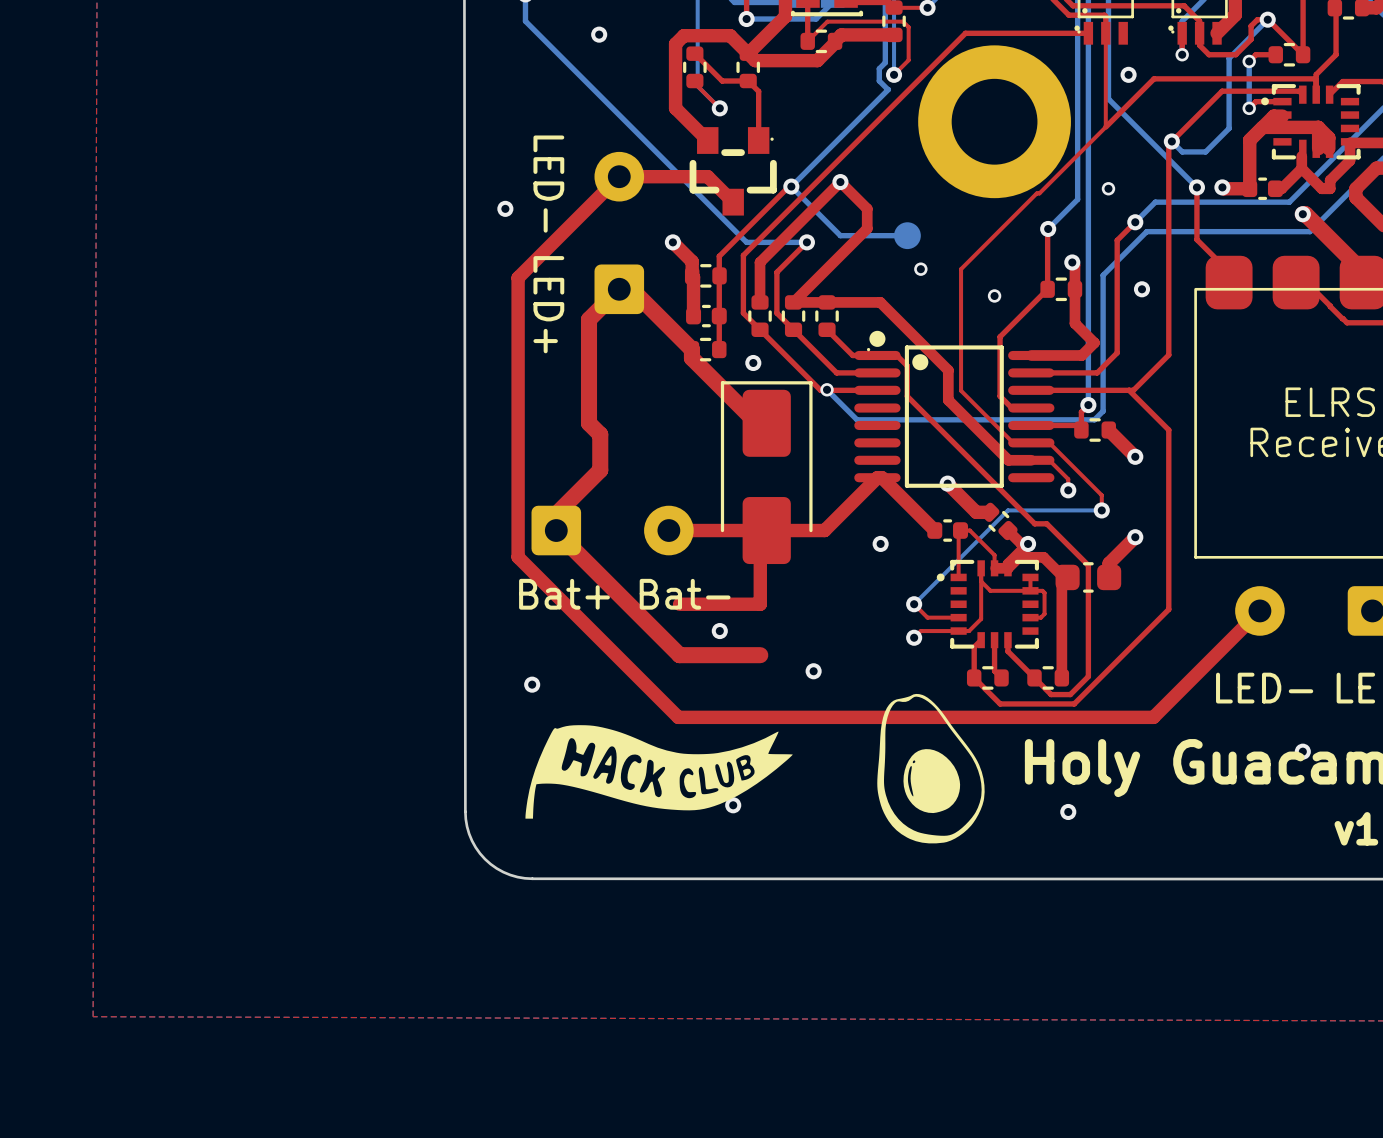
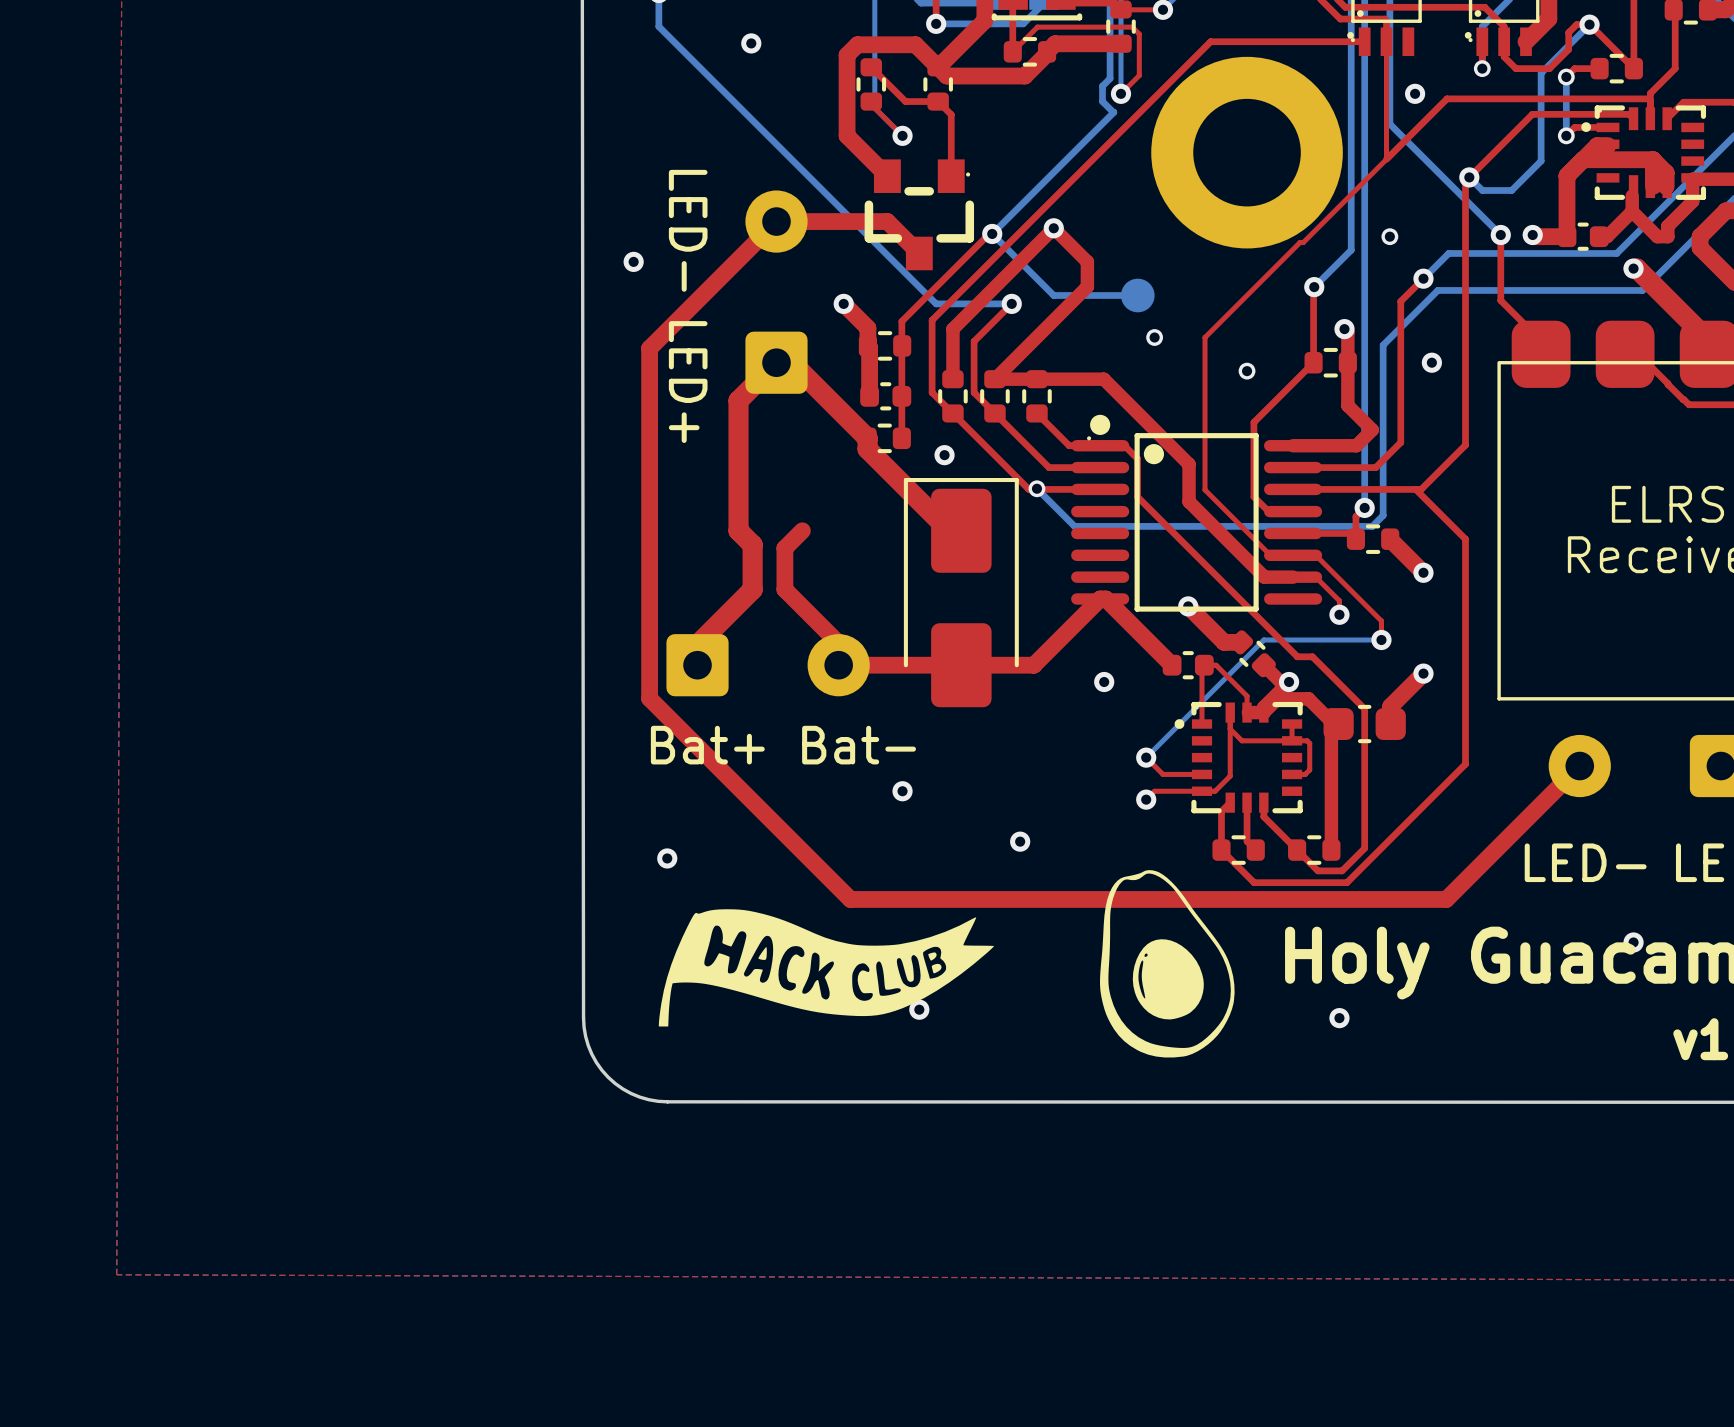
top track: none -> (802, 530) (784, 548) (784, 589) (838, 643)
top track: (556, 530) (679, 655) (760, 655) -> none
top track: (766, 530) (760, 536) (760, 604) (679, 604) -> none

